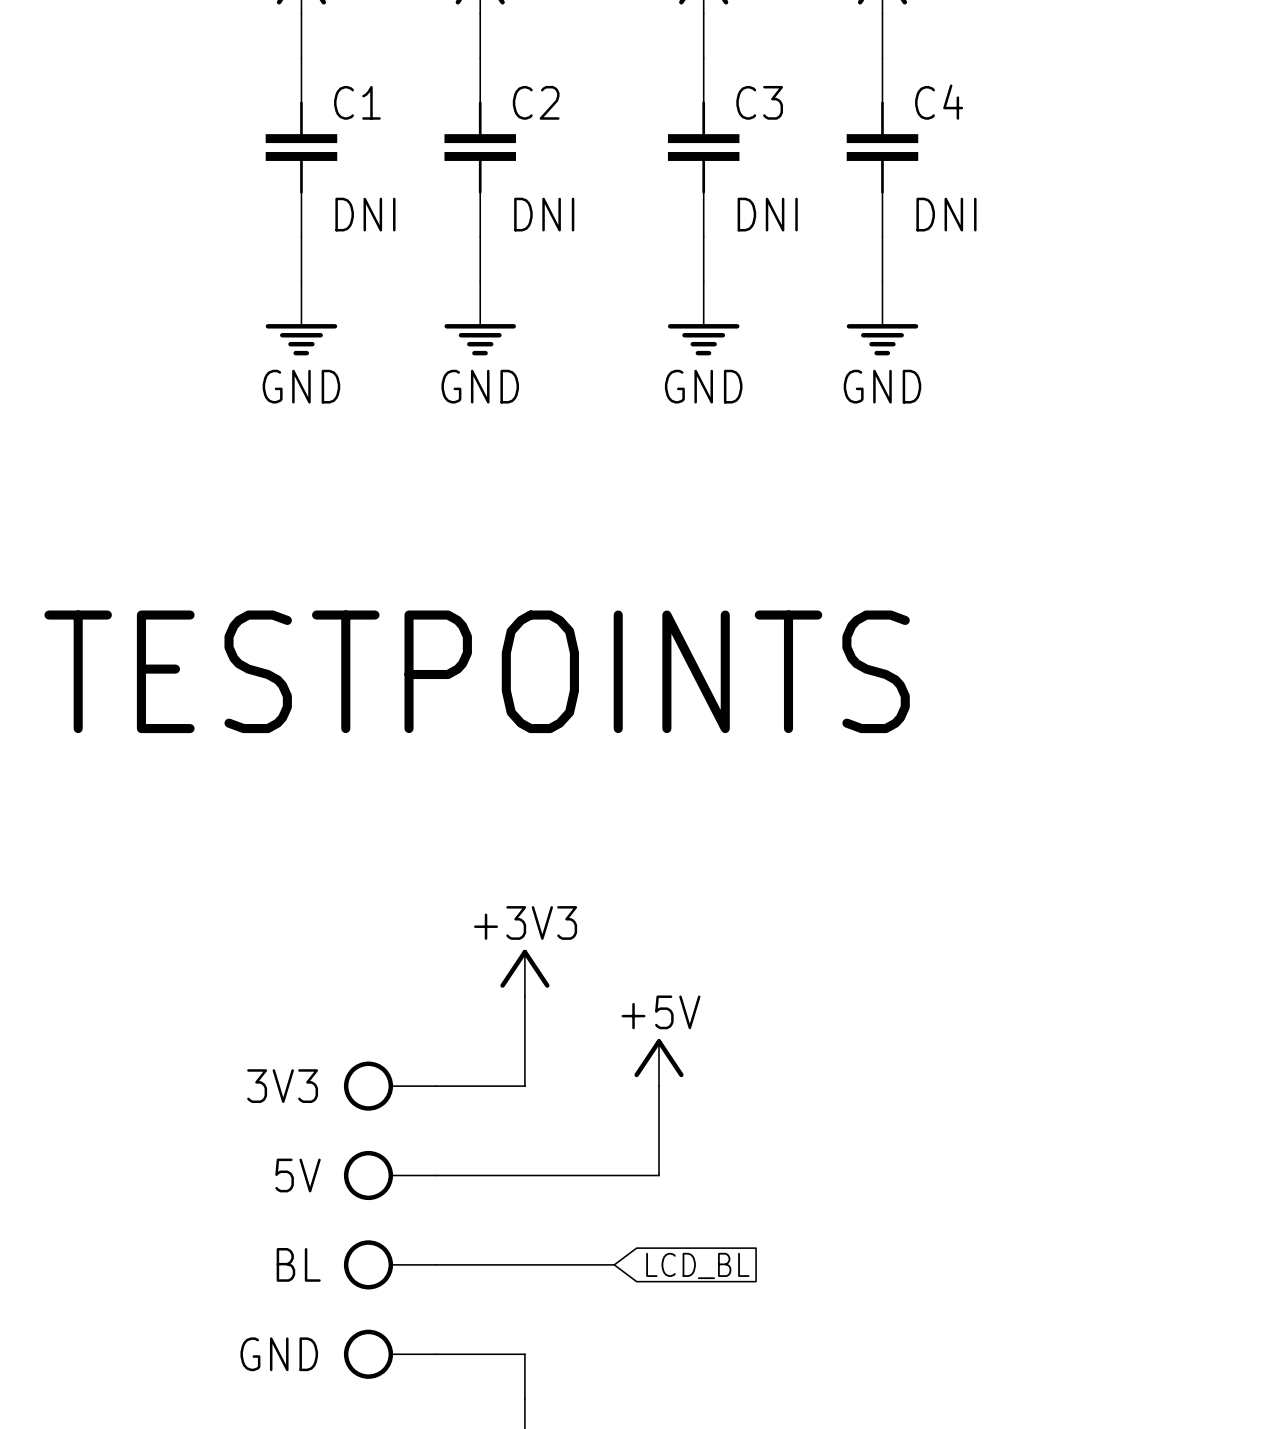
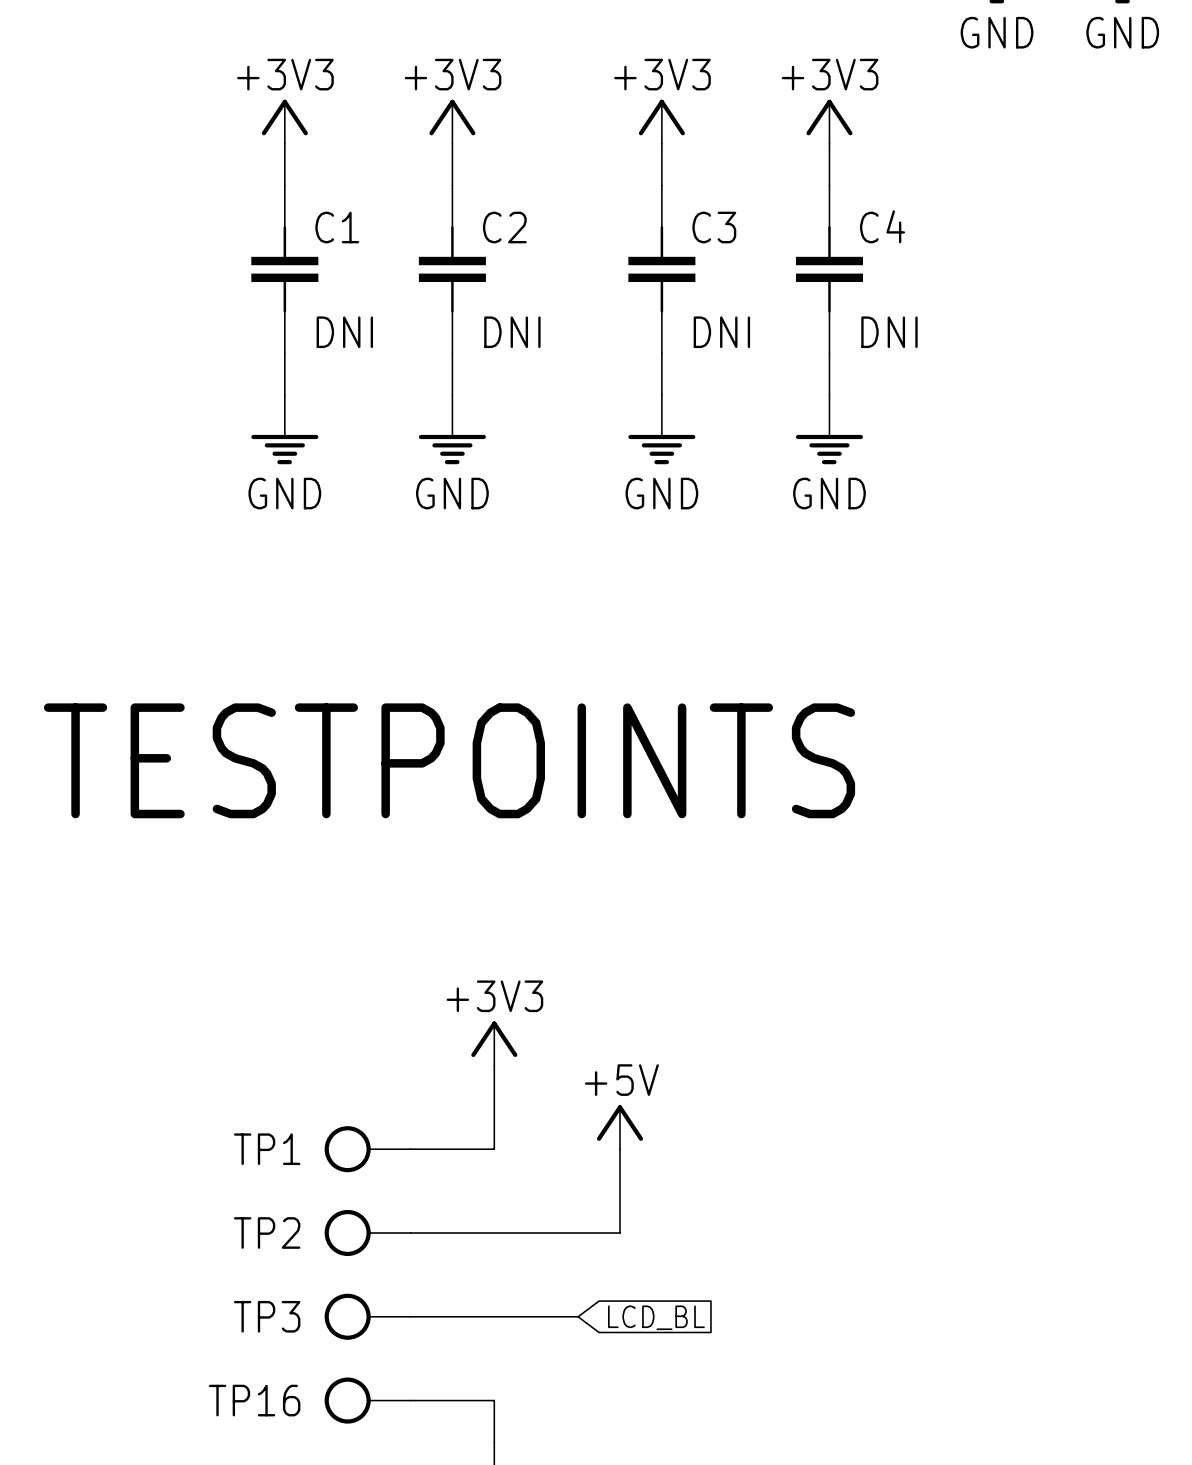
3V3 name: 3V3 (282, 1086) -> TP1 (267, 1149)
5V name: 5V (298, 1175) -> TP2 (267, 1232)
BL name: BL (298, 1264) -> TP3 (267, 1316)
GND name: GND (279, 1354) -> TP16 (254, 1400)

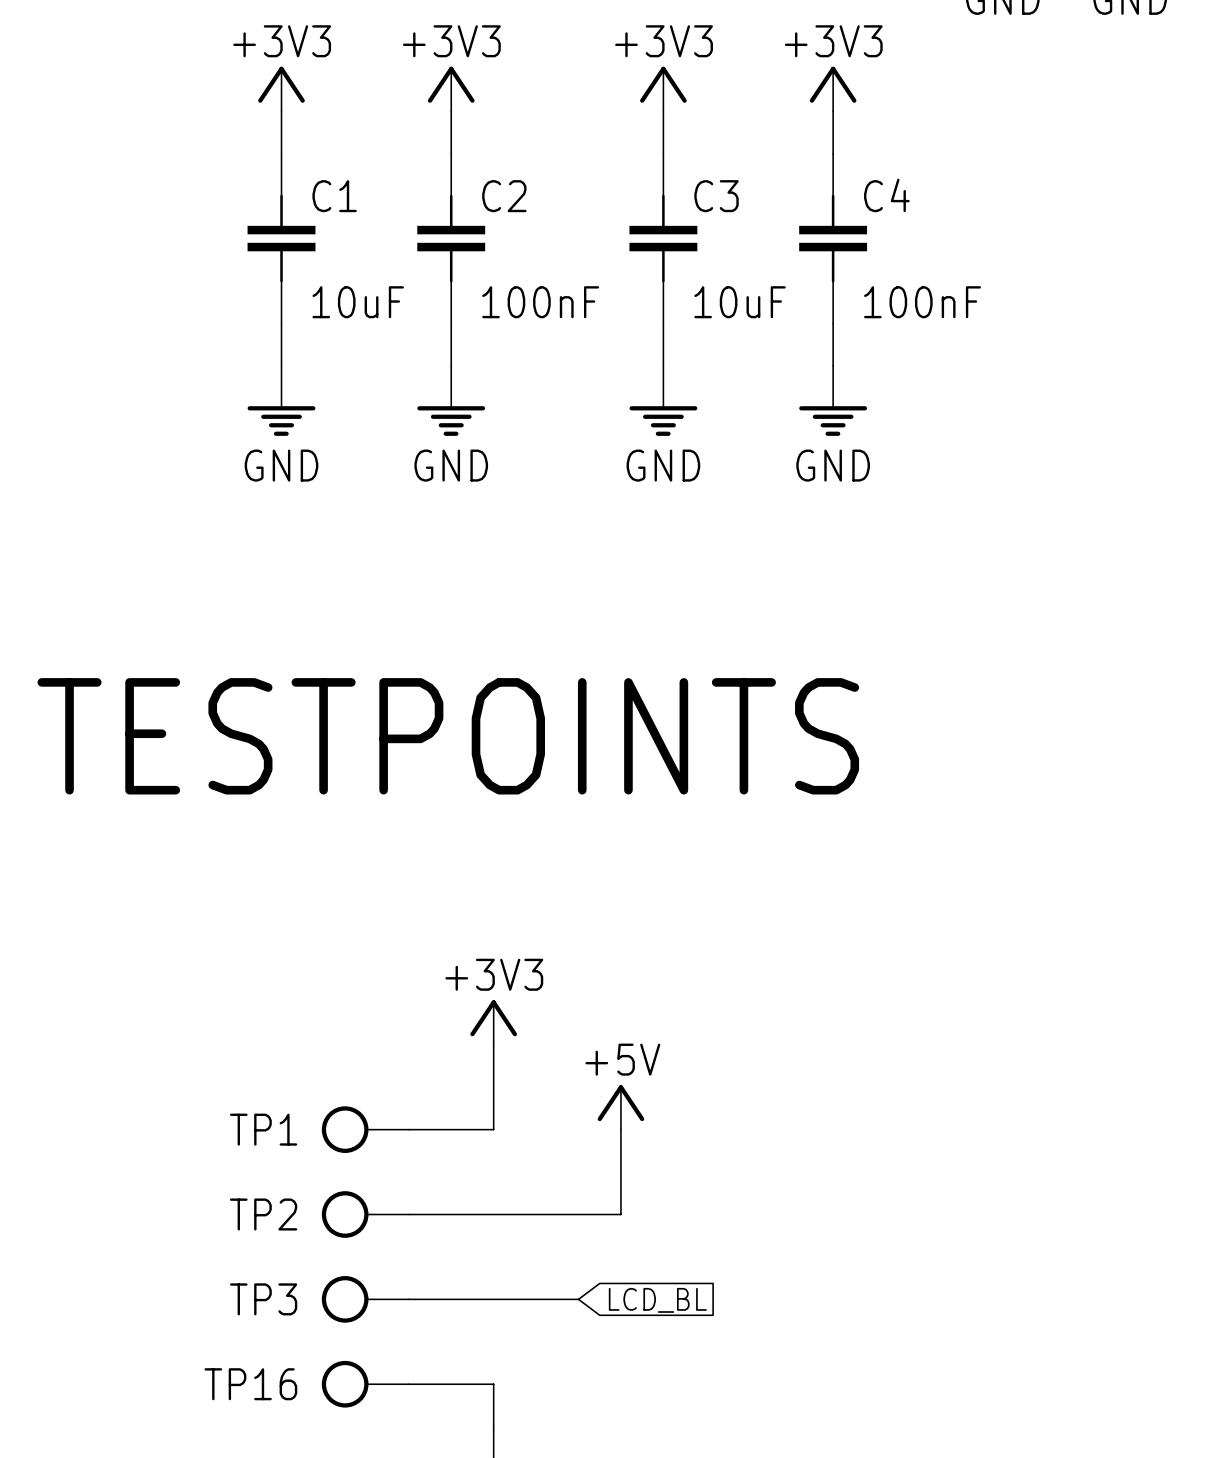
C1 value: DNI (344, 332) -> 10uF (358, 302)
C2 value: DNI (512, 332) -> 100nF (540, 302)
C3 value: DNI (721, 332) -> 10uF (740, 302)
C4 value: DNI (889, 332) -> 100nF (922, 302)

